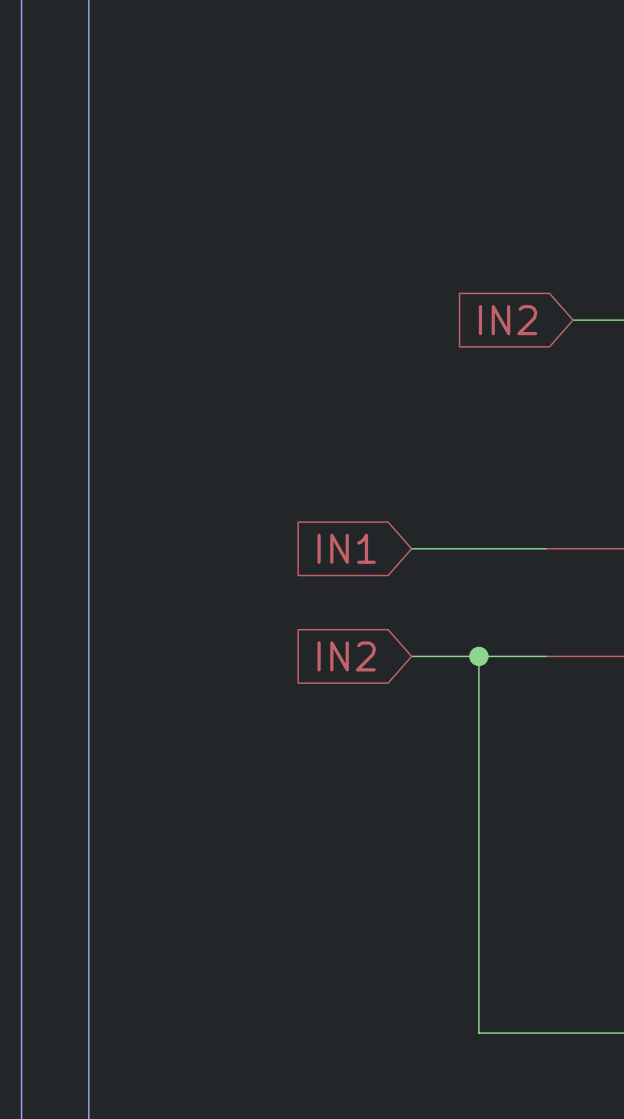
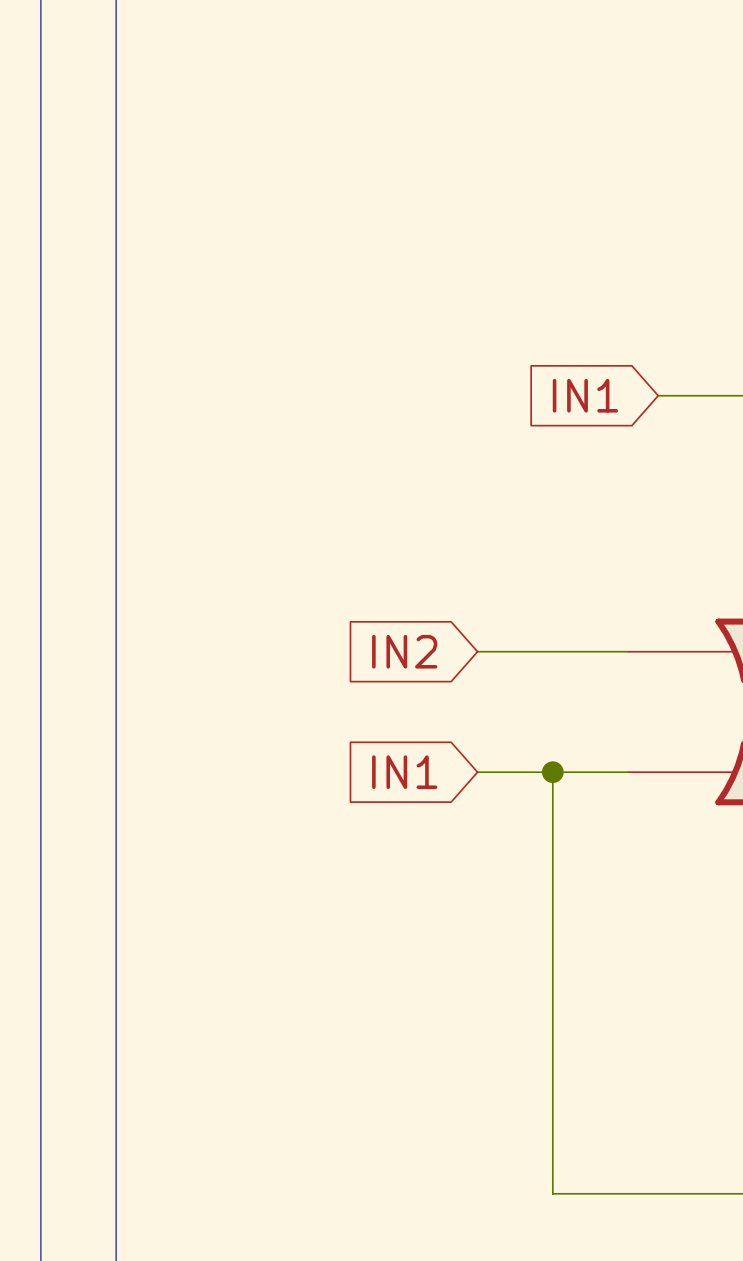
global label: IN2 (508, 320) -> IN1 (585, 395)
global label: IN1 (346, 548) -> IN2 (404, 651)
global label: IN2 (346, 656) -> IN1 (404, 772)

